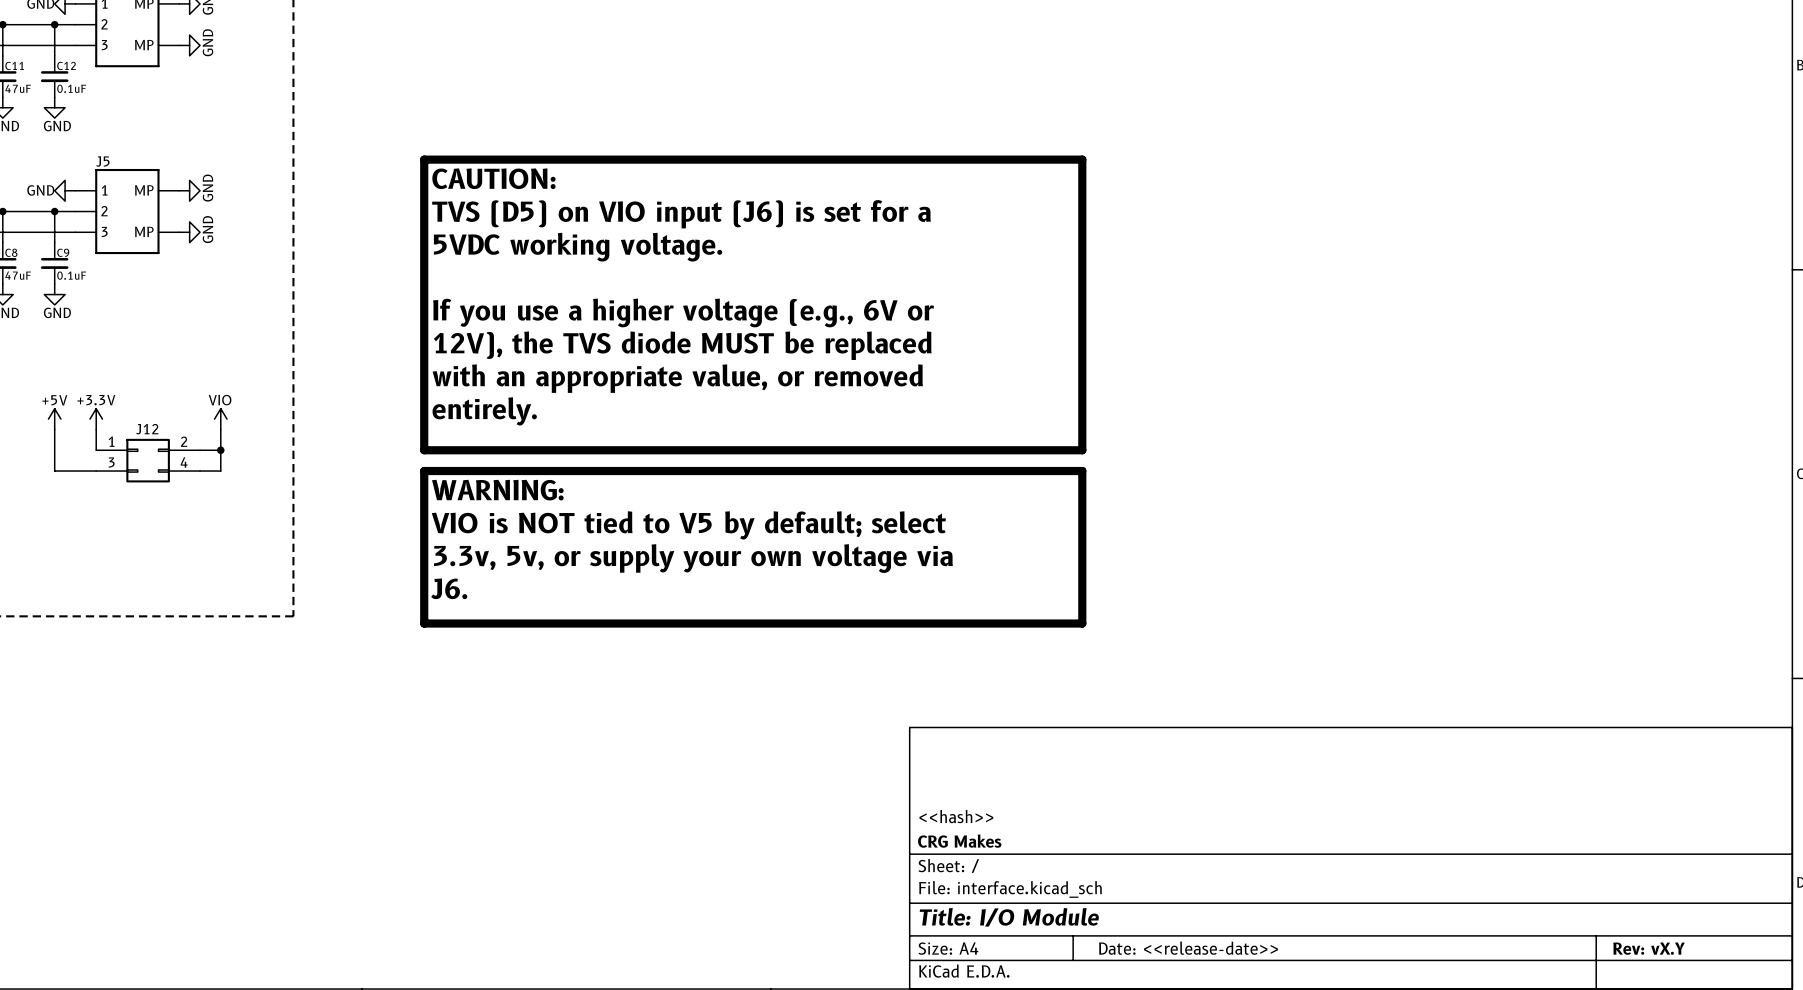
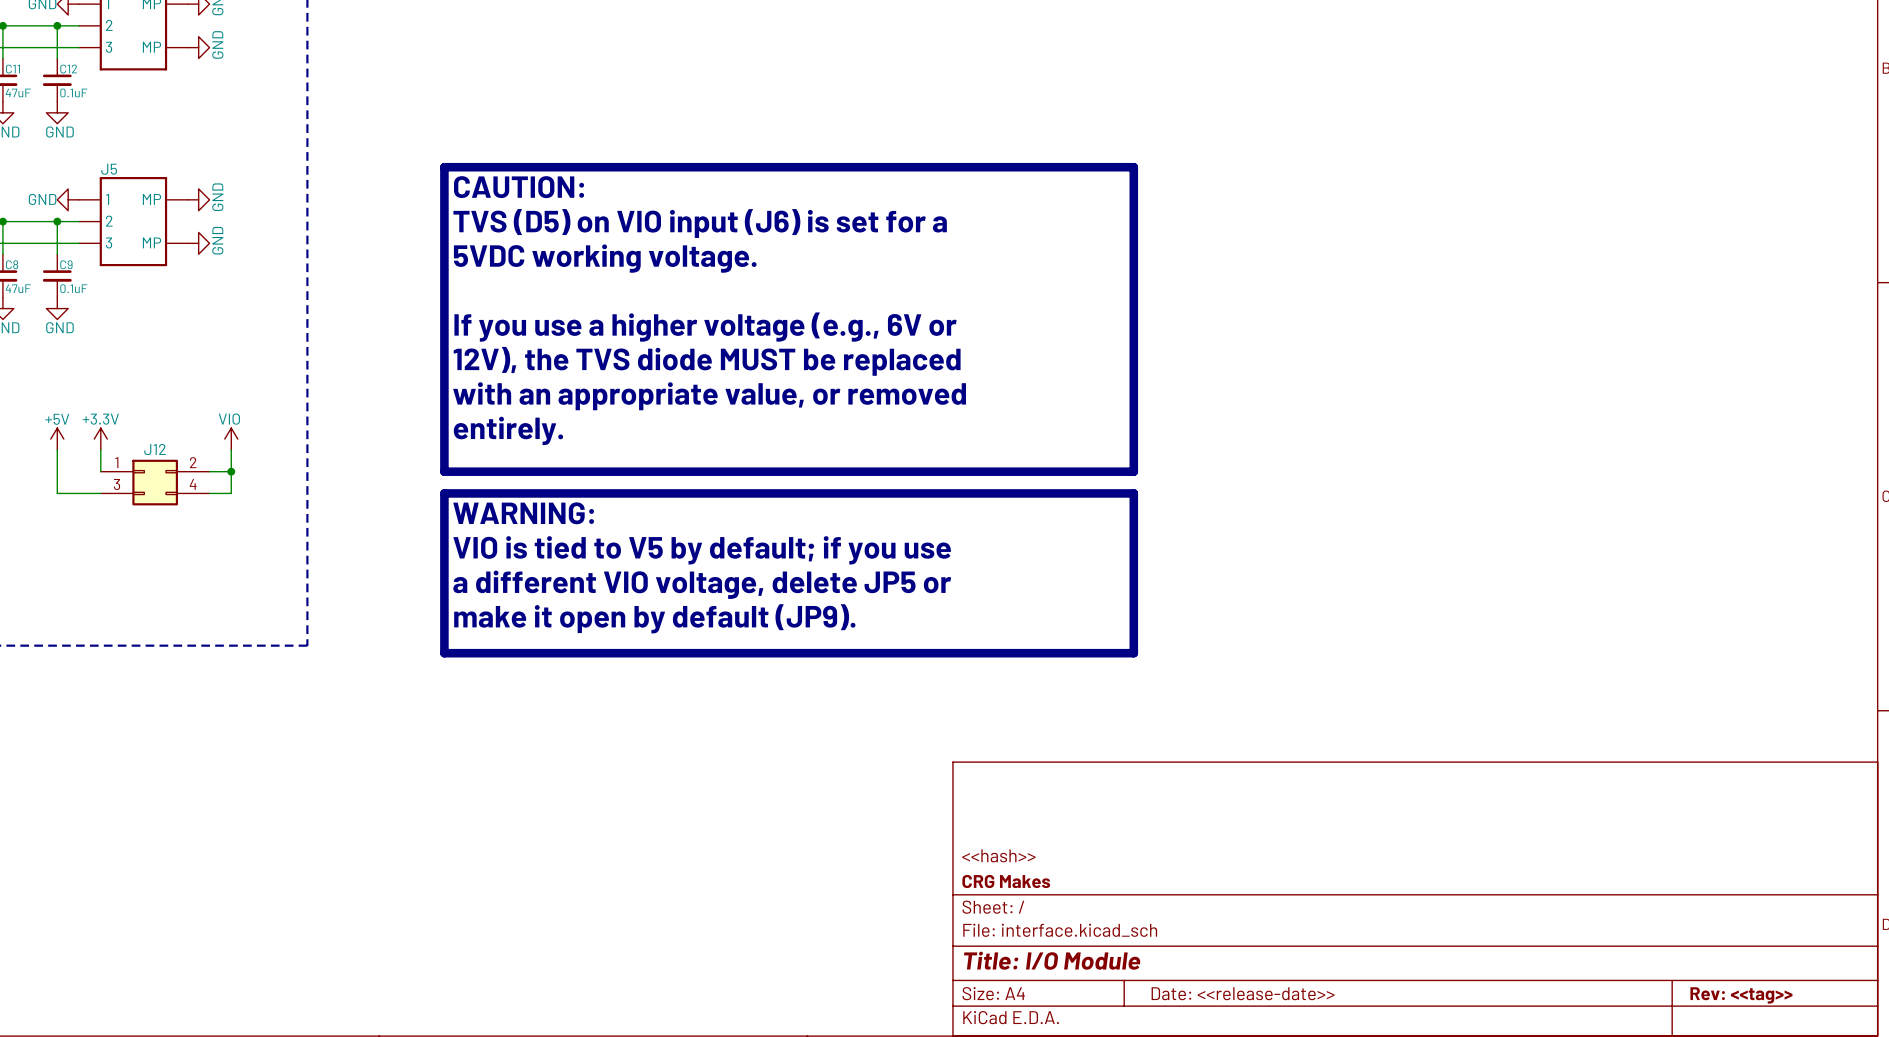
text: VIO is NOT tied to V5 by default; select (688, 525) -> VIO is tied to V5 by default; if you use (702, 550)
text: 3.3v, 5v, or supply your own voltage via (693, 558) -> a different VIO voltage, delete JP5 or (702, 584)
text: J6. (449, 588) -> make it open by default (JP9). (654, 618)
title block: Rev: vX.Y (1649, 948) -> Rev: <<tag>> (1741, 995)

